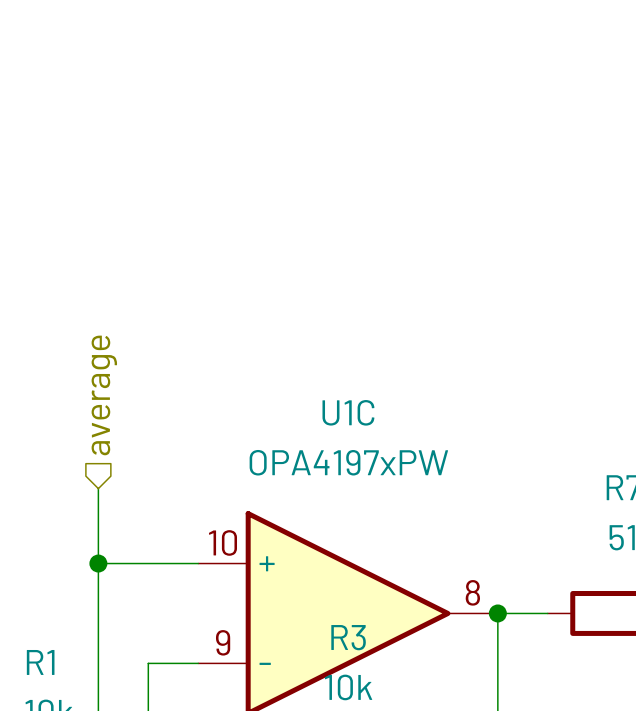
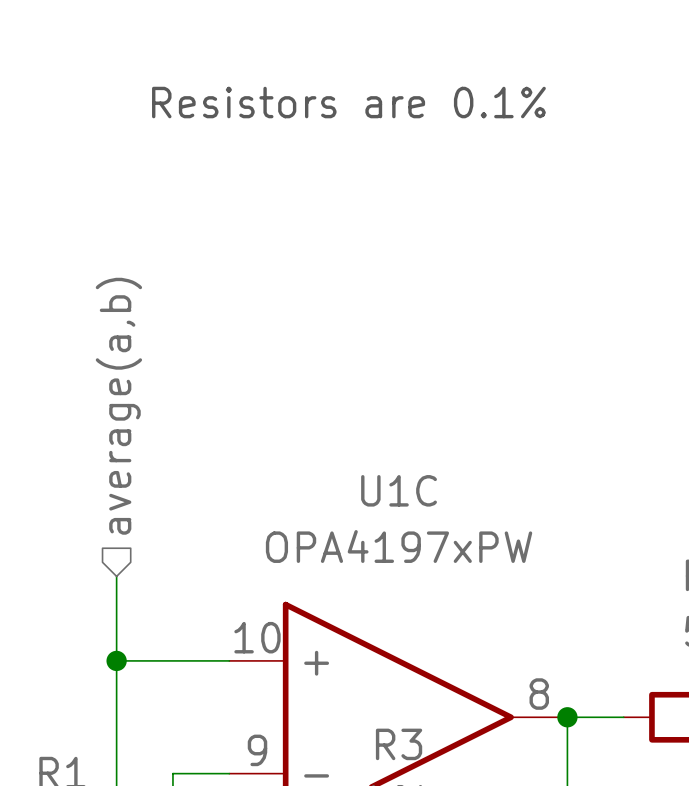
text: none -> Resistors are 0.1% (348, 102)
hierarchical label: average (104, 395) -> average(a,b) (118, 406)

